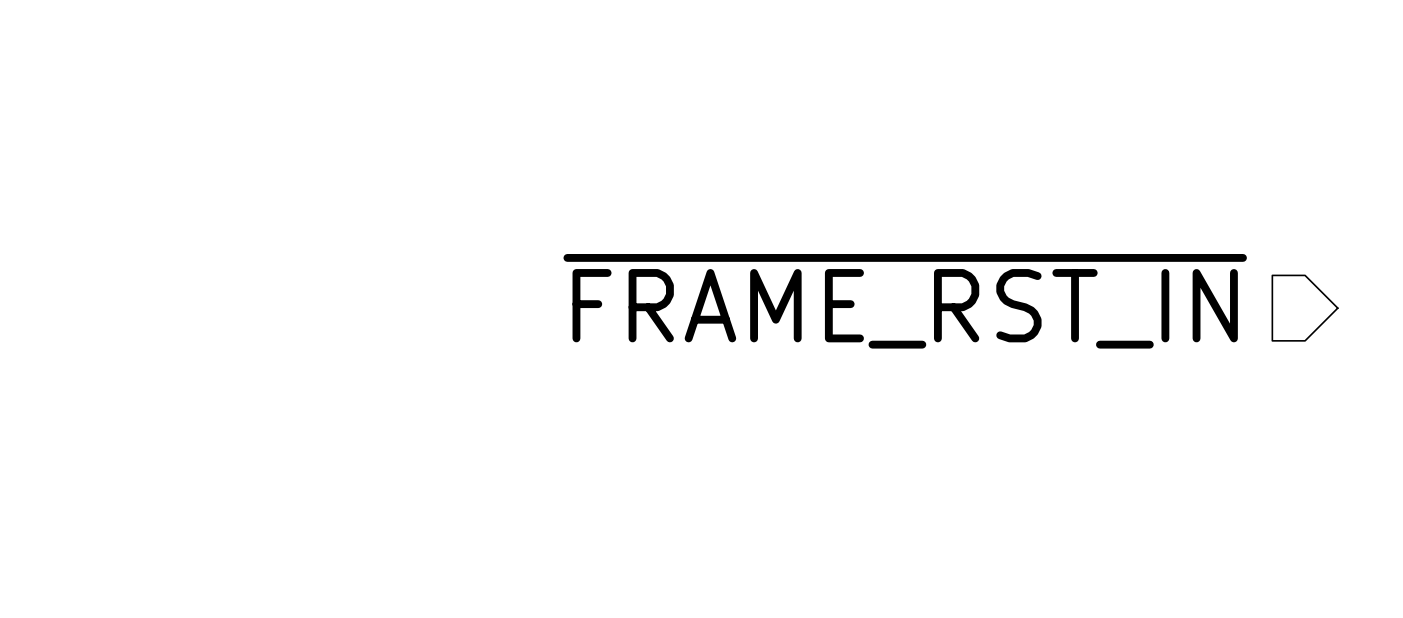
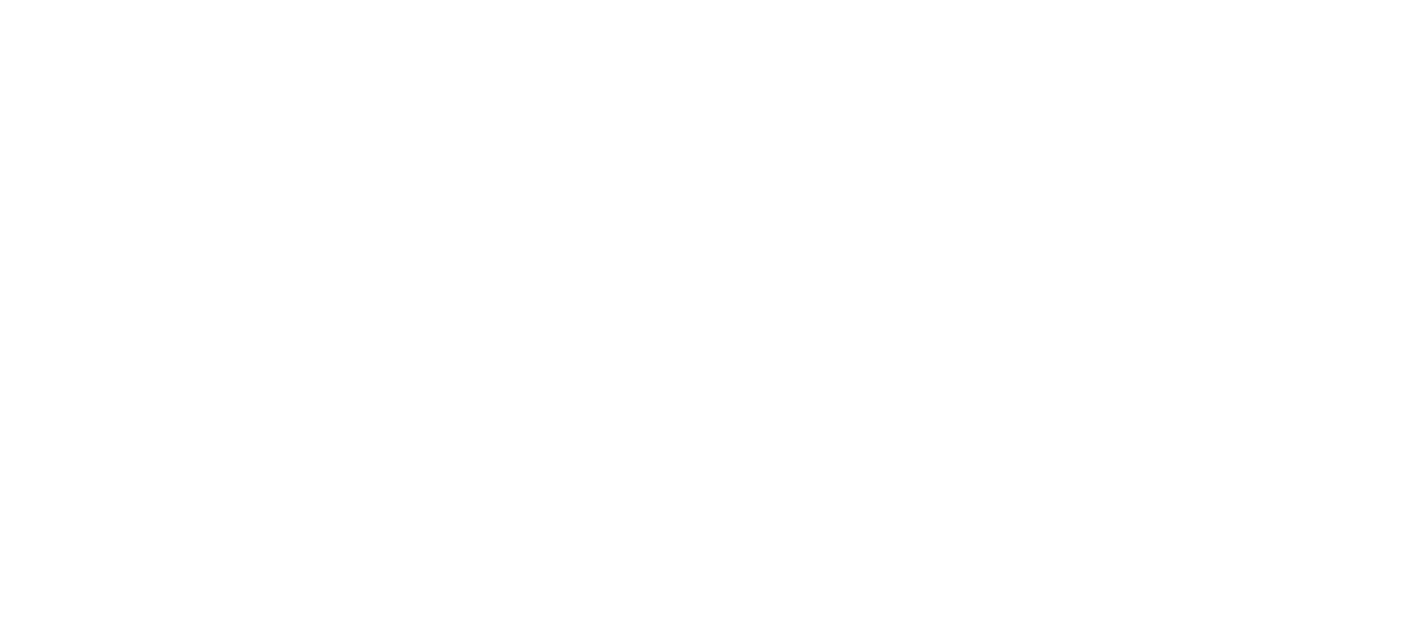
hierarchical label: ~{FRAME_RST_IN} (905, 301) -> none

